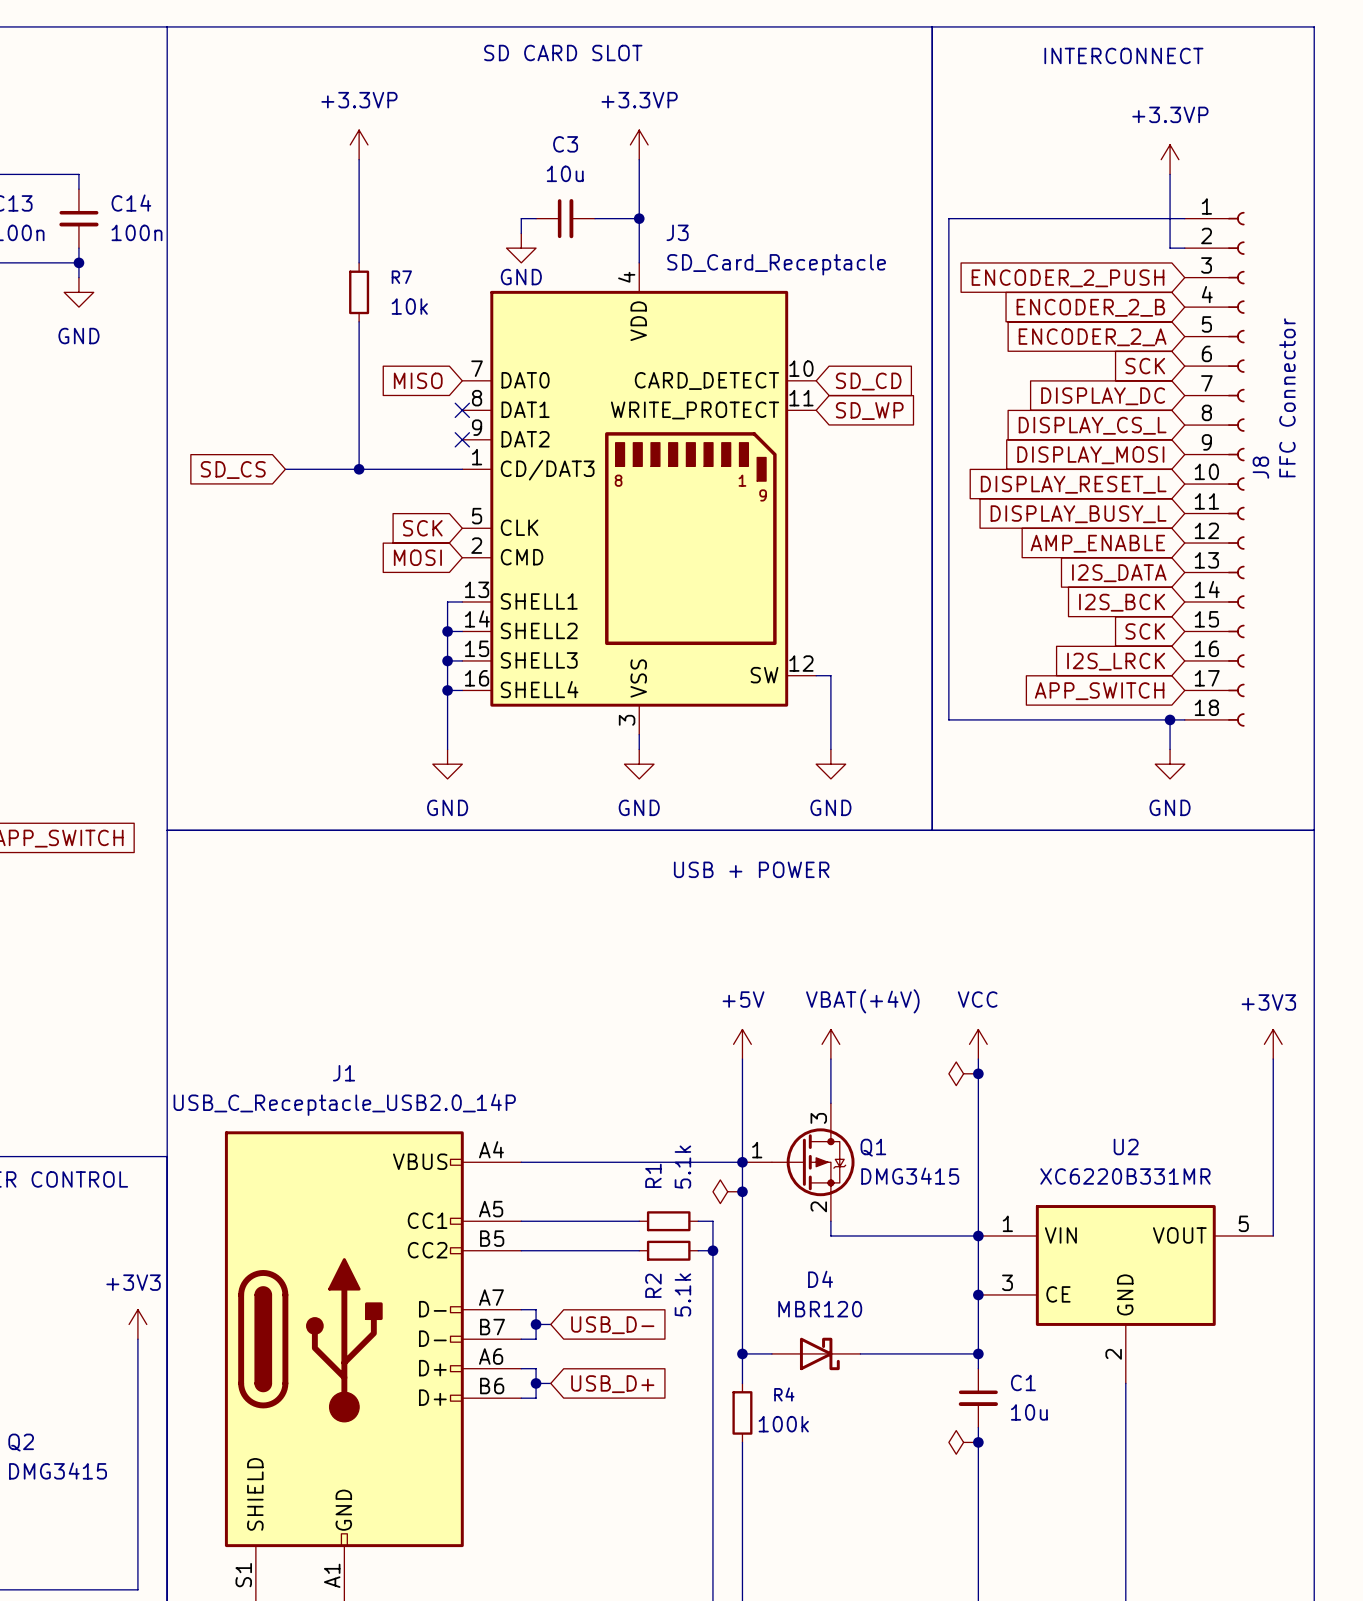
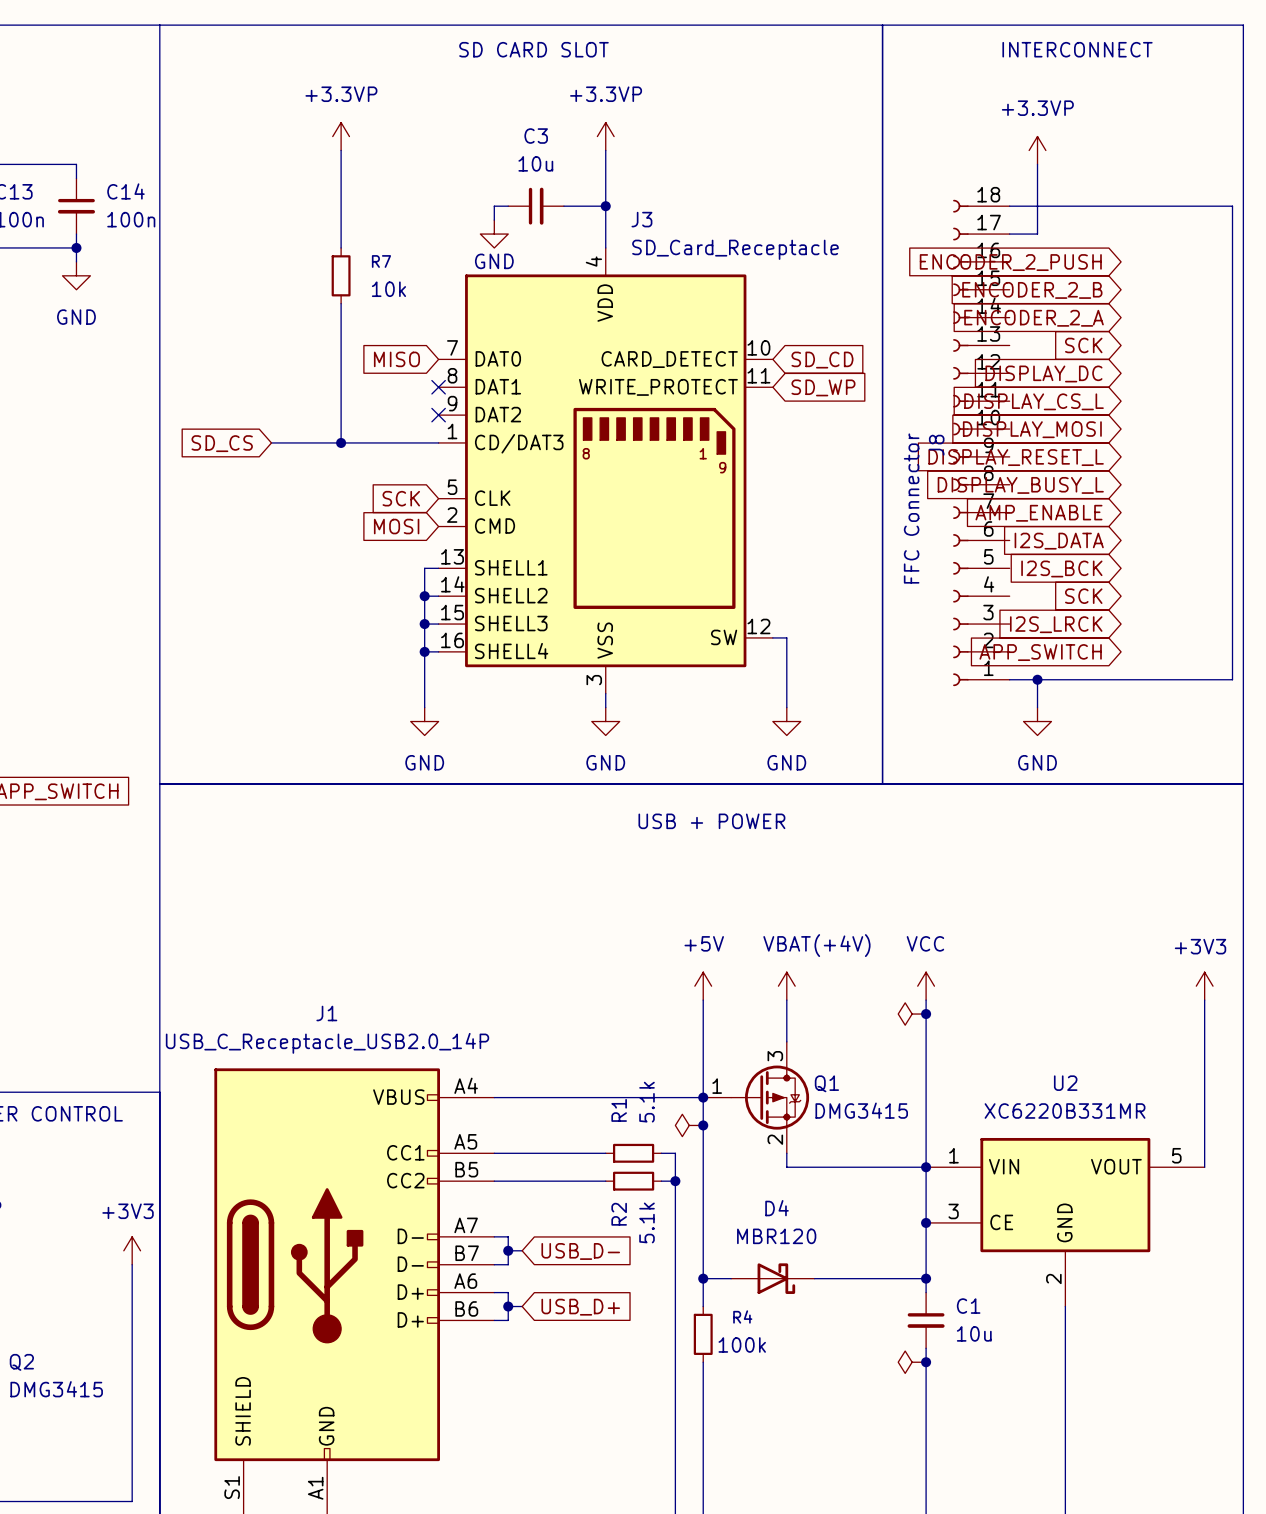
text position: INTERCONNECT (1123, 55) -> INTERCONNECT (1077, 49)
power symbol position: +3.3VP (1170, 159) -> +3.3VP (1037, 150)
wire: none -> (1037, 164) (1037, 234) (1009, 234)
wire: (1170, 174) (1170, 248) (1184, 248) -> none
wire: (1066, 218) (948, 218) (948, 719) (1066, 719) -> none
wire: none -> (1121, 206) (1232, 206) (1232, 679) (1121, 679)
J8 rotation: 0° (1236, 469) -> 180° (960, 442)
junction: none -> (1037, 679)
wire: (1170, 719) (1170, 749) -> (1037, 679) (1037, 707)
junction: (1170, 719) -> none
power symbol position: GND (1170, 764) -> GND (1037, 721)

